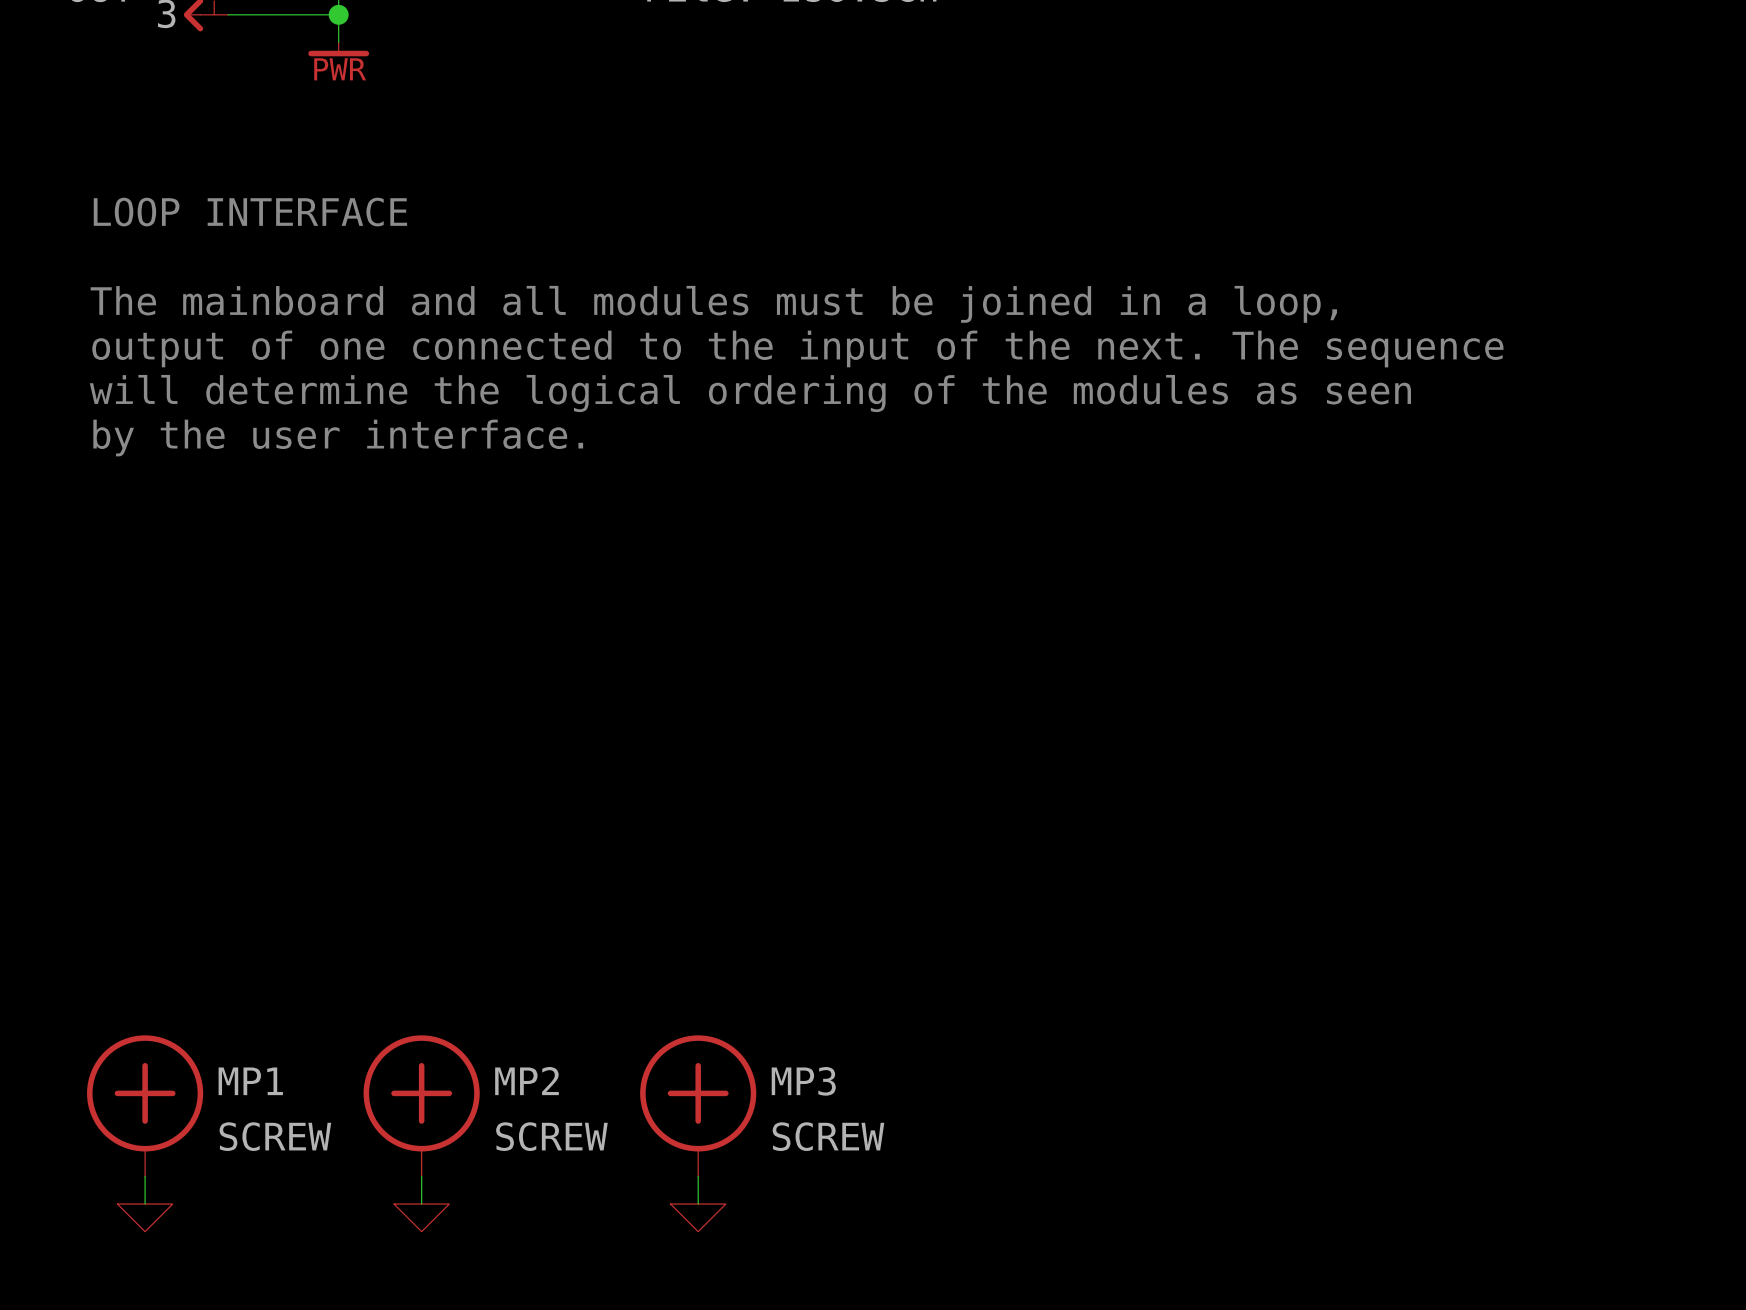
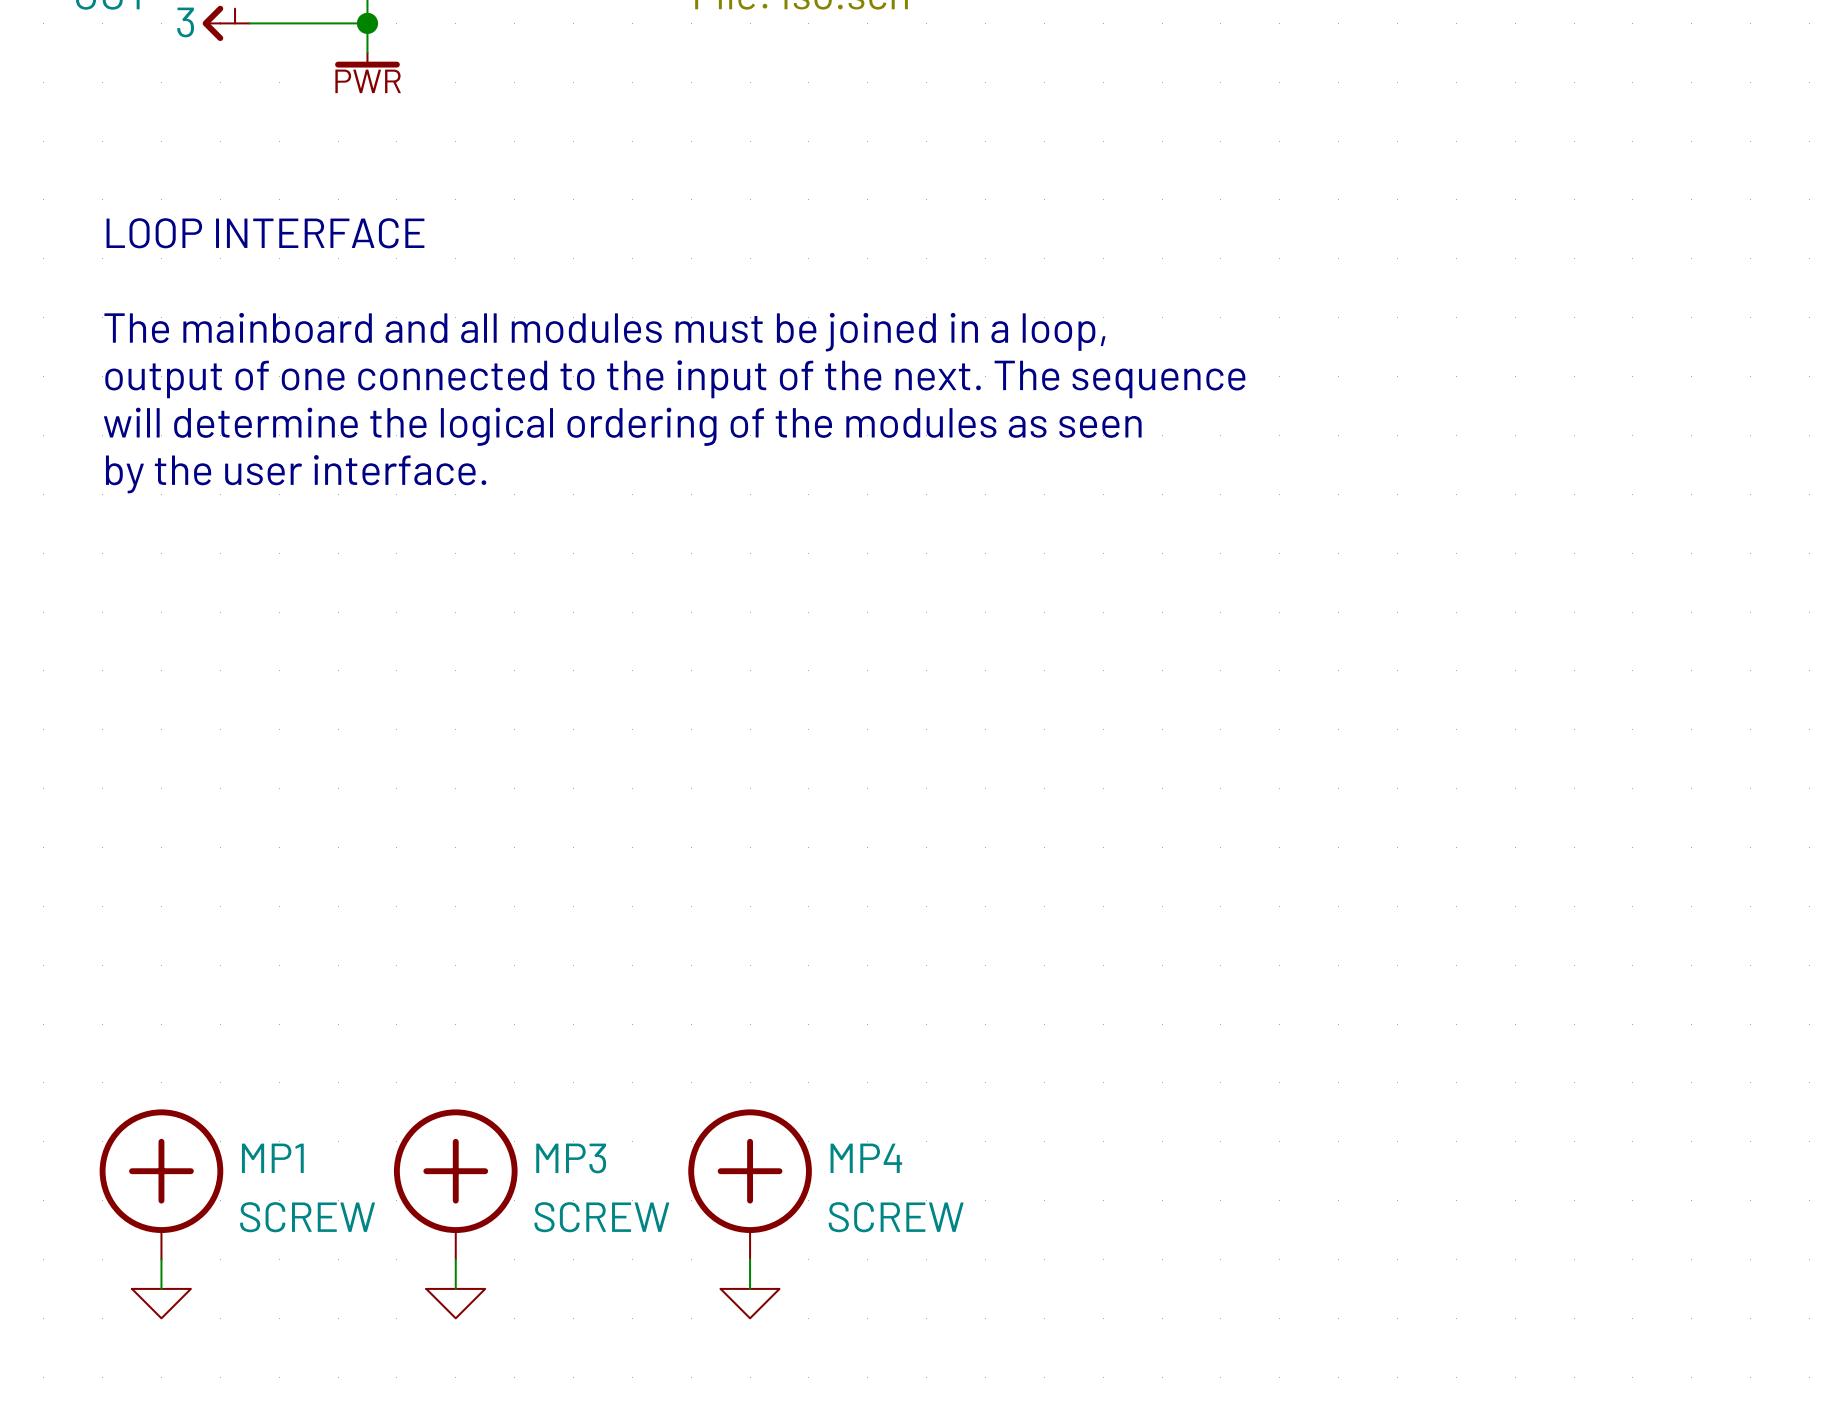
MP2 name: MP2 (527, 1081) -> MP3 (571, 1158)
MP3 name: MP3 (803, 1081) -> MP4 (866, 1158)

